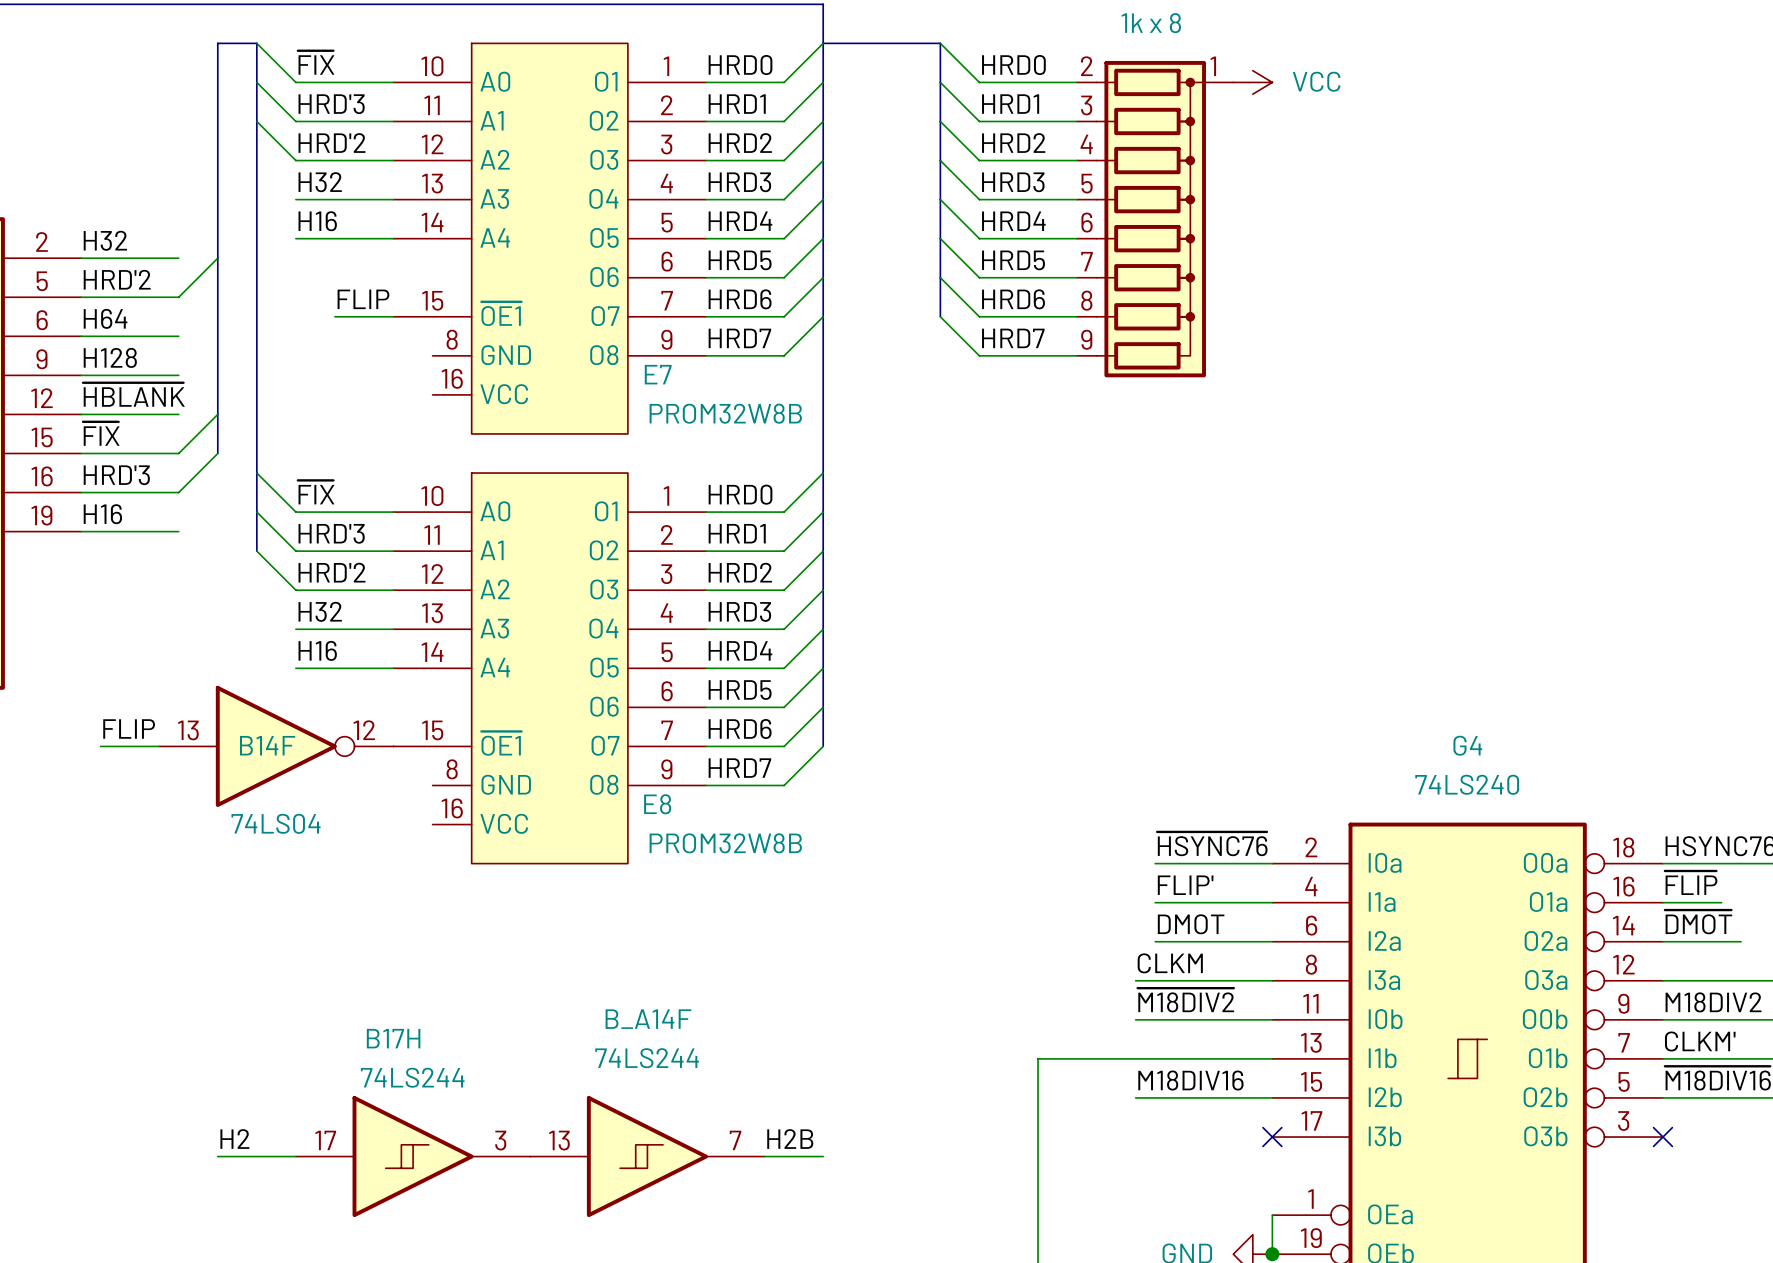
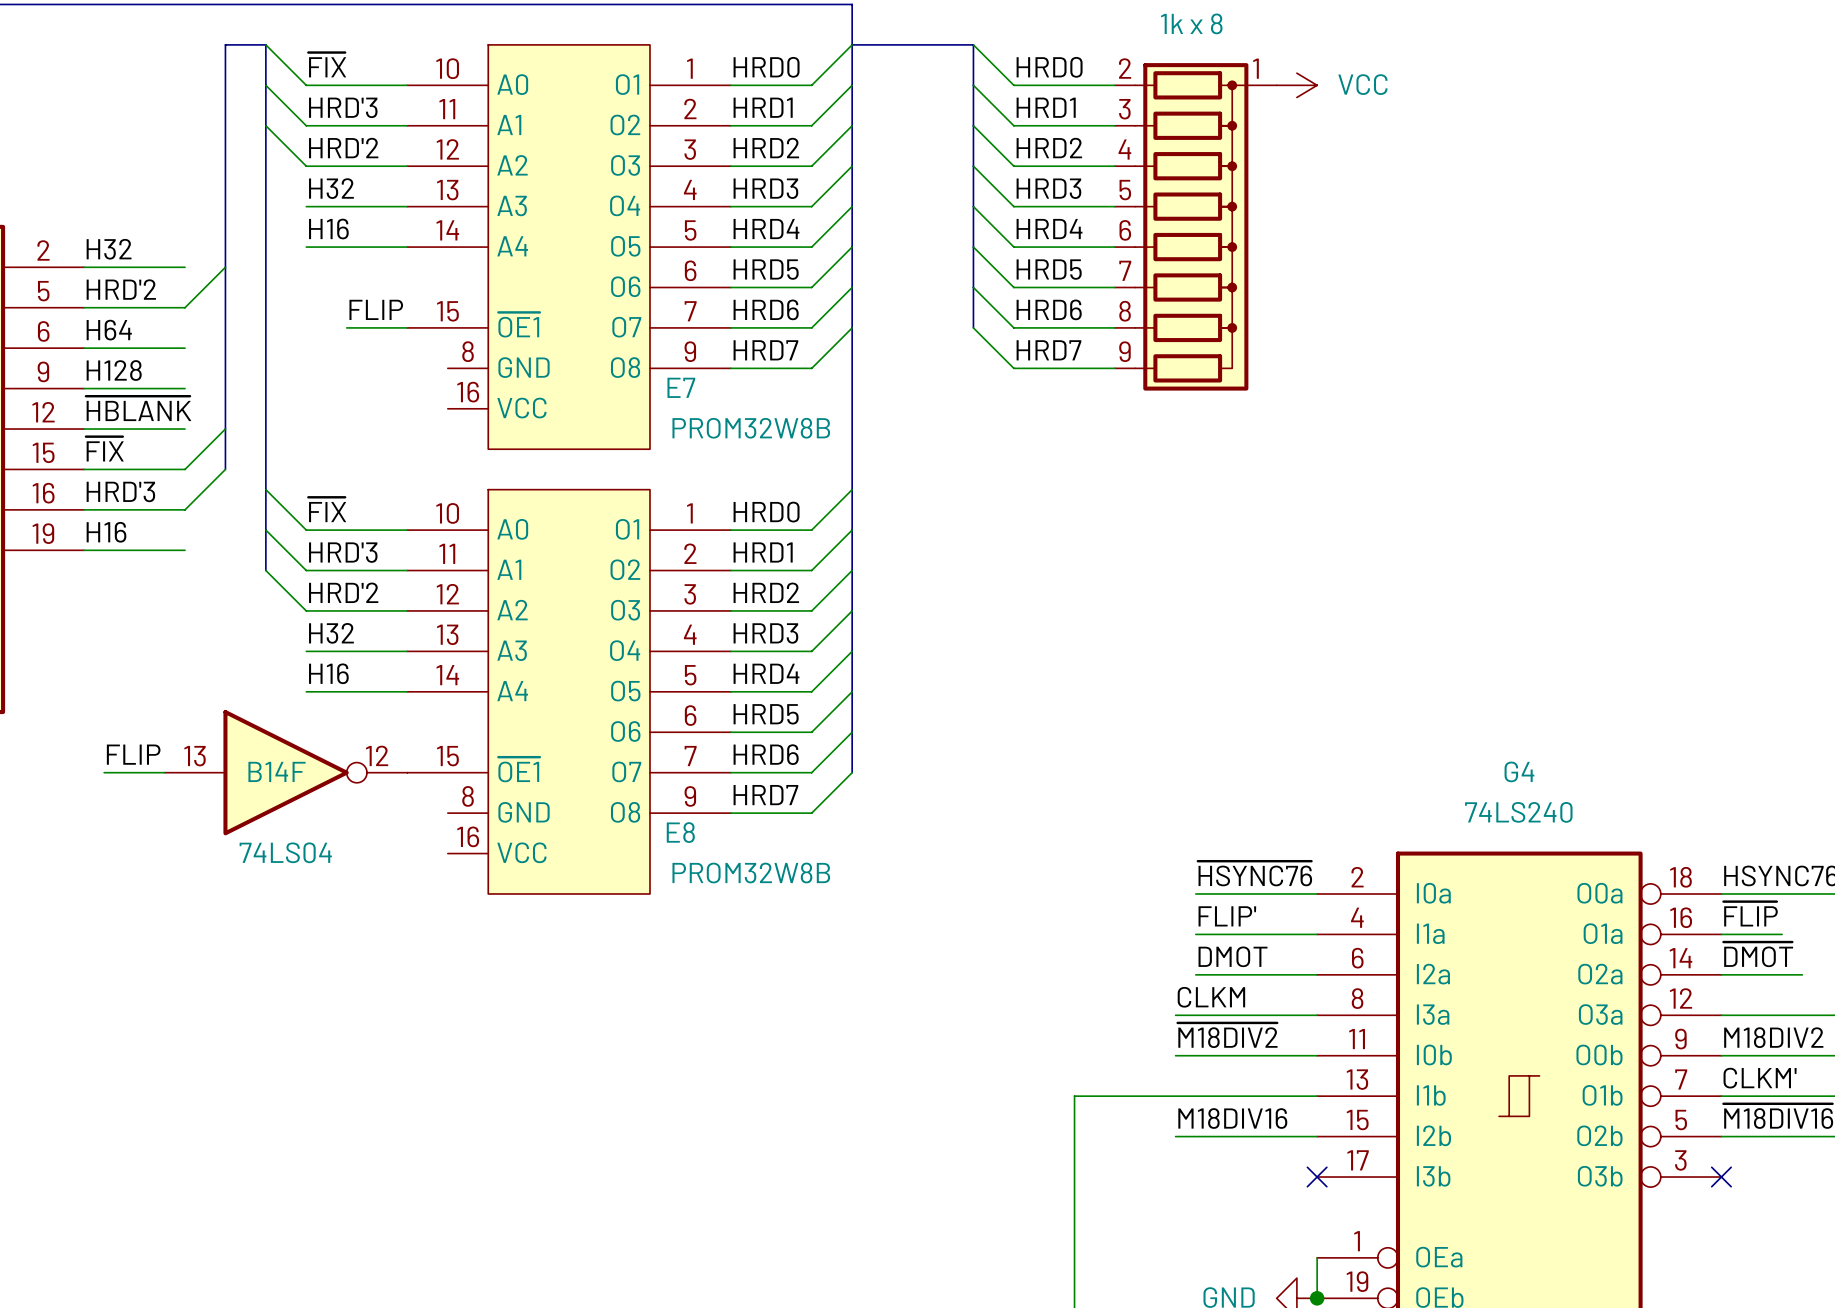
label: H2 (234, 1139) -> none
label: H2B (790, 1139) -> none
wire: (217, 1156) (295, 1156) -> none
B17H: 74LS244 (413, 1156) -> none
B_A14F: 74LS244 (647, 1156) -> none
wire: (764, 1156) (823, 1156) -> none

